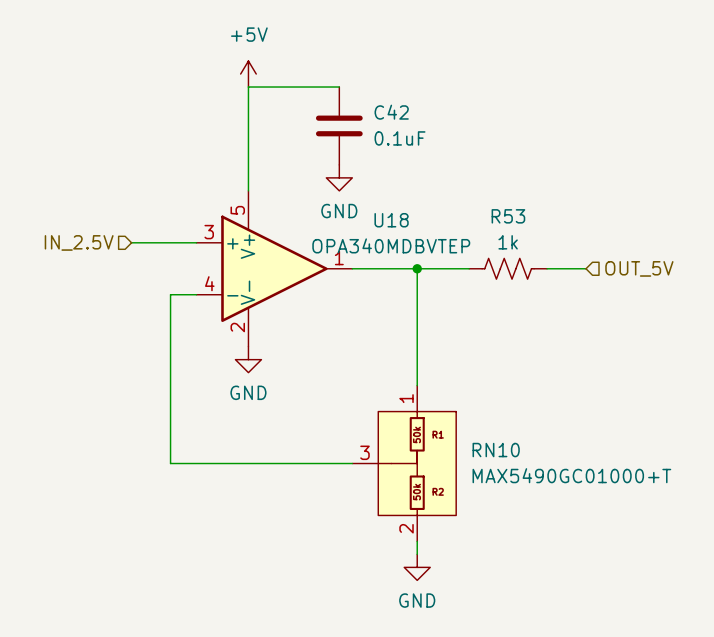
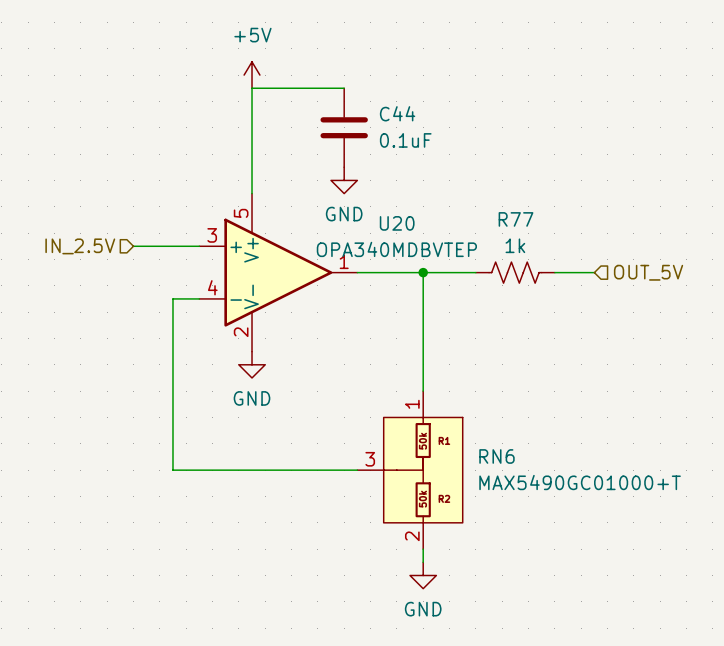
C42 name: C42 (391, 112) -> C44 (397, 113)
R53 name: R53 (508, 216) -> R77 (516, 219)
U18 name: U18 (391, 220) -> U20 (397, 223)
RN10 name: RN10 (496, 450) -> RN6 (496, 456)

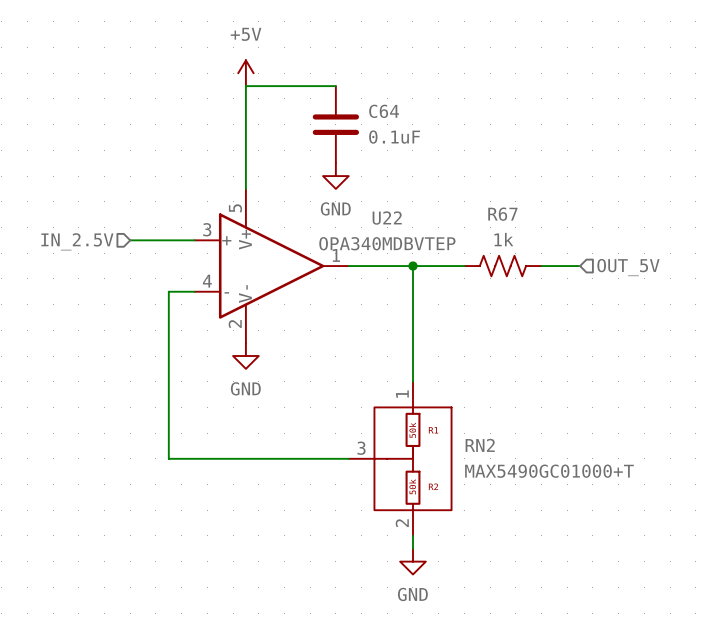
C44 name: C44 (397, 113) -> C64 (384, 111)
R77 name: R77 (516, 219) -> R67 (502, 214)
U20 name: U20 (397, 223) -> U22 (387, 218)
RN6 name: RN6 (496, 456) -> RN2 (480, 445)

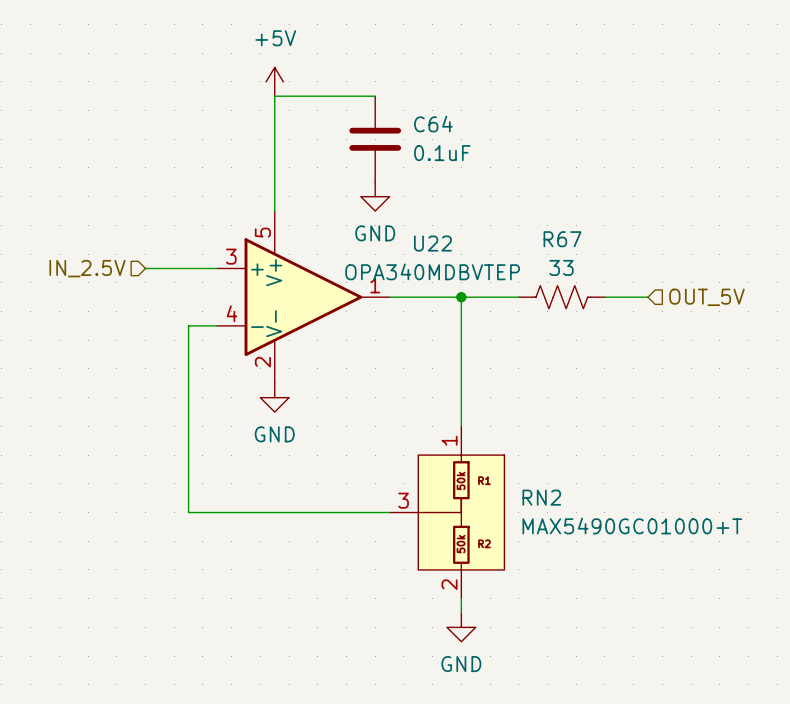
R67 value: 1k (503, 239) -> 33 (561, 267)

